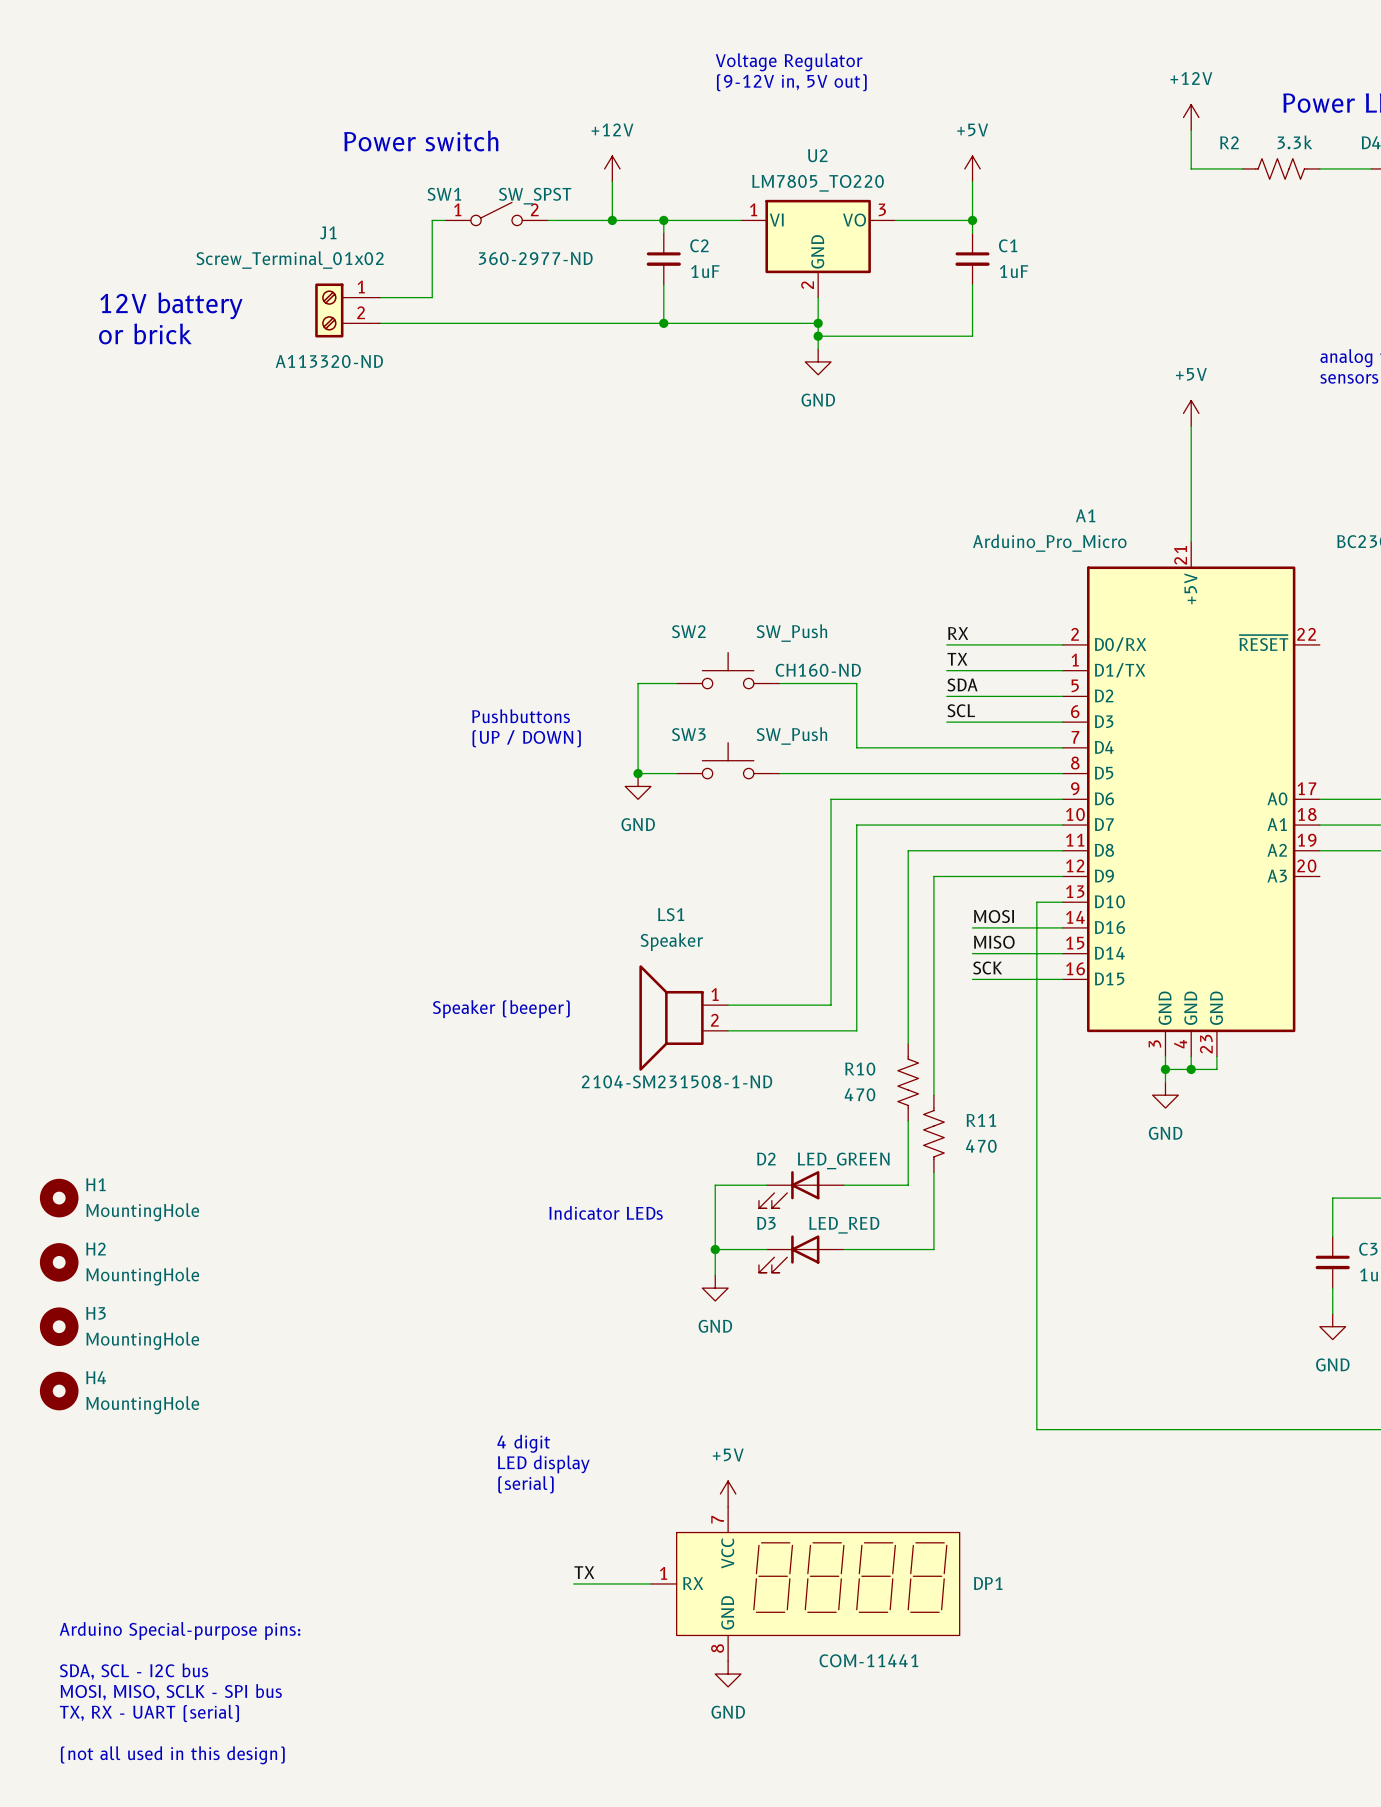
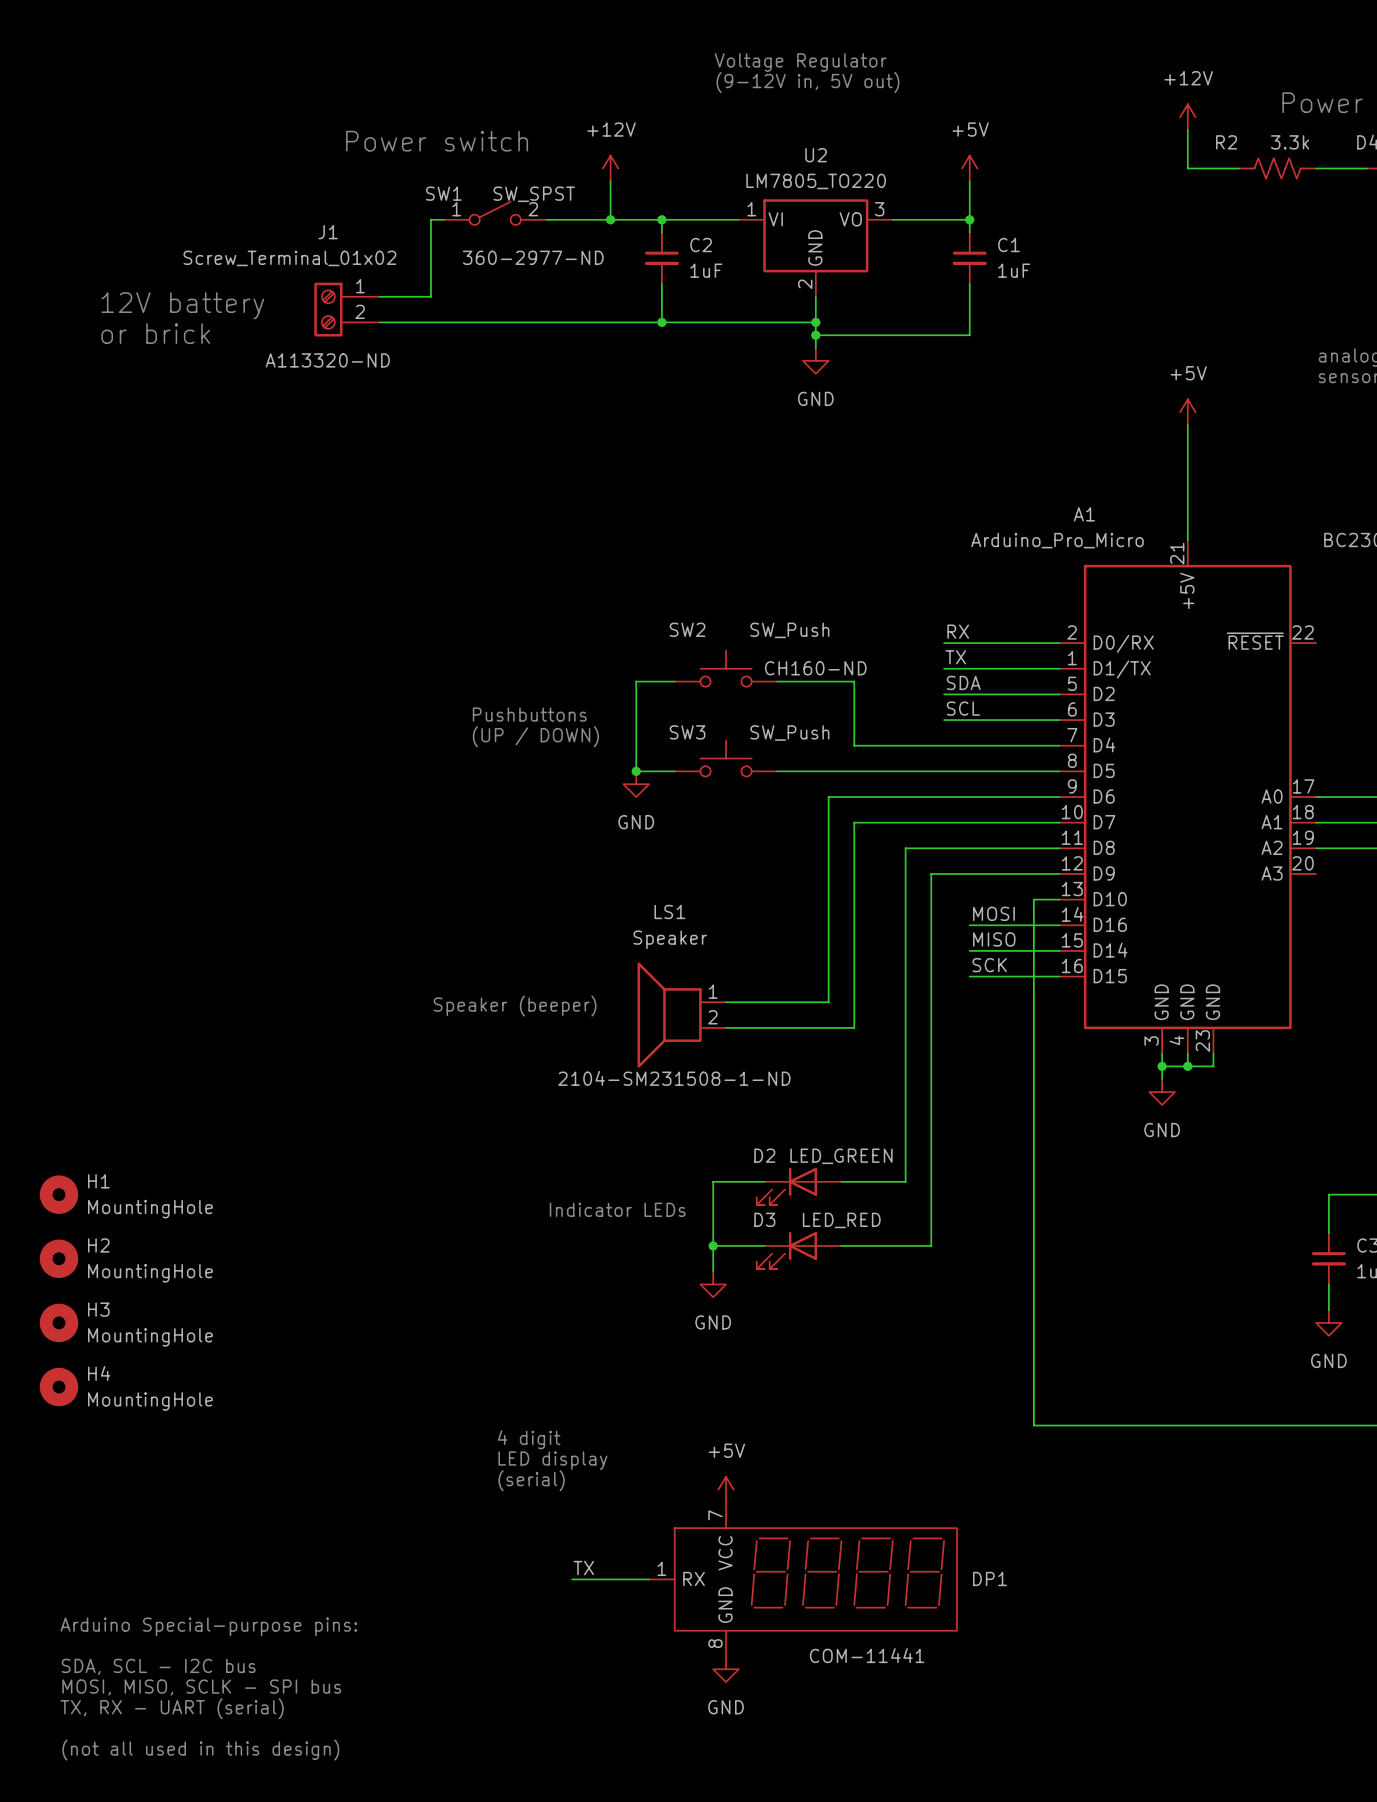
R10: 470 (908, 1082) -> none
R11: 470 (933, 1133) -> none

